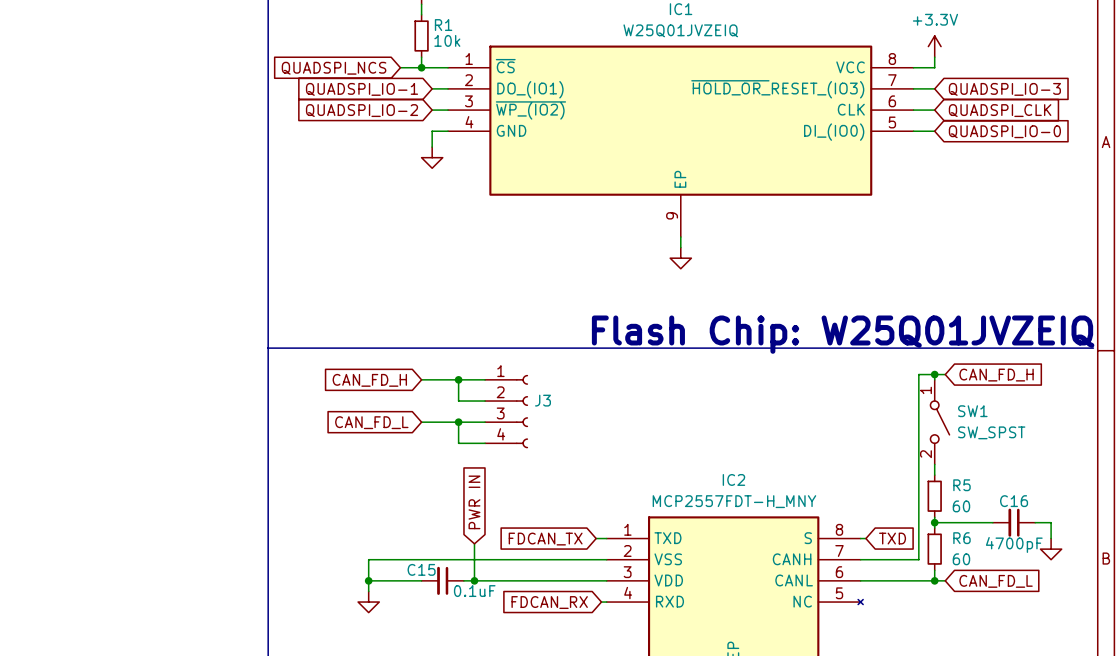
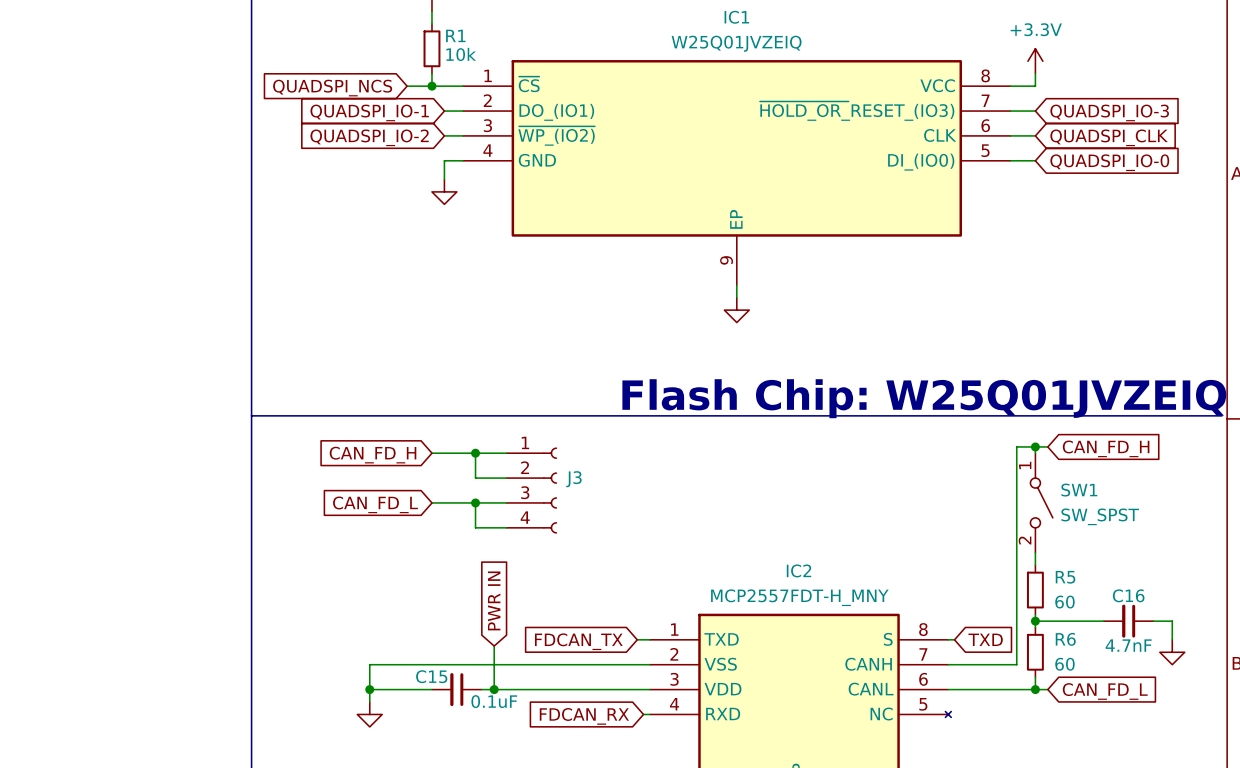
C16 value: 4700pF (1014, 544) -> 4.7nF (1128, 645)

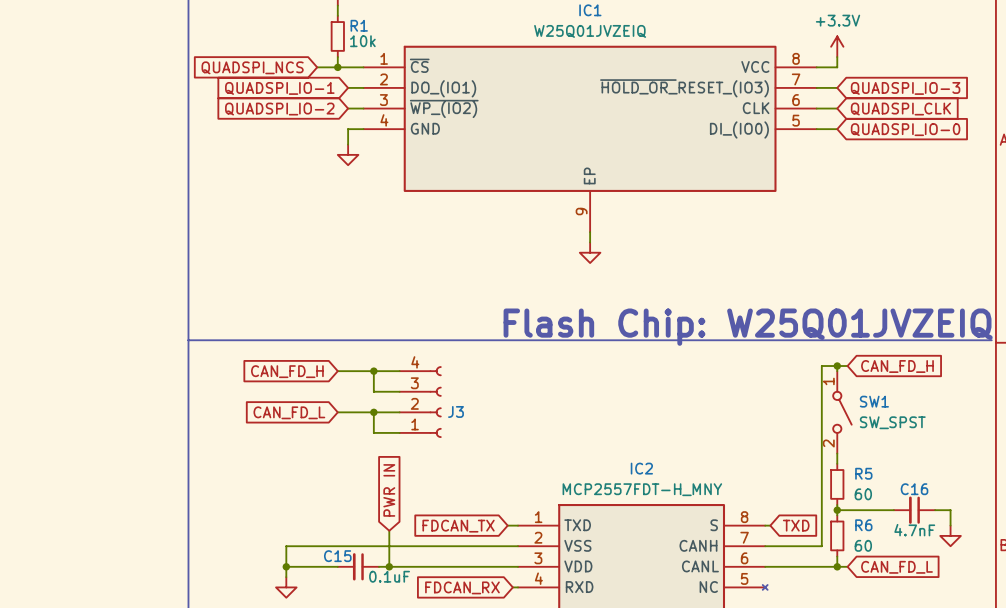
J3 flip: as is (550, 490) -> up-down (435, 402)

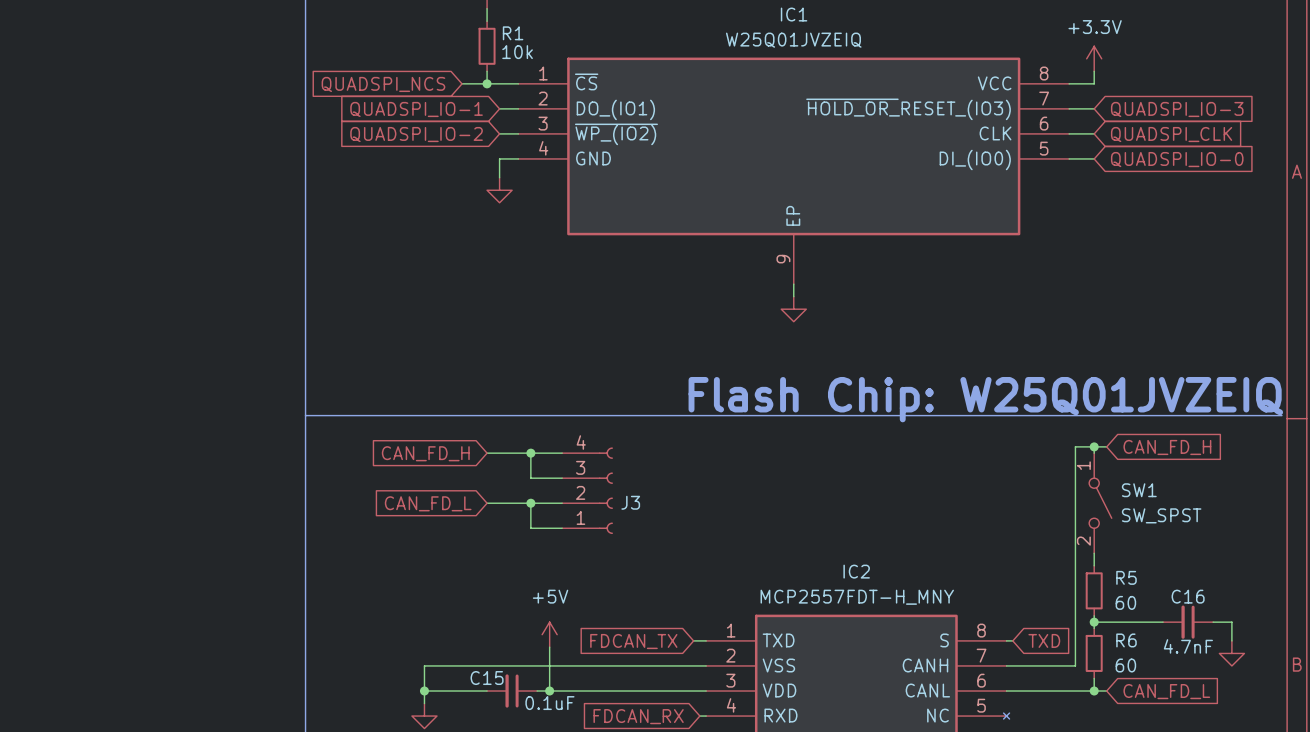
global label: PWR IN (389, 490) -> none
power symbol: none -> +5V (549, 634)

